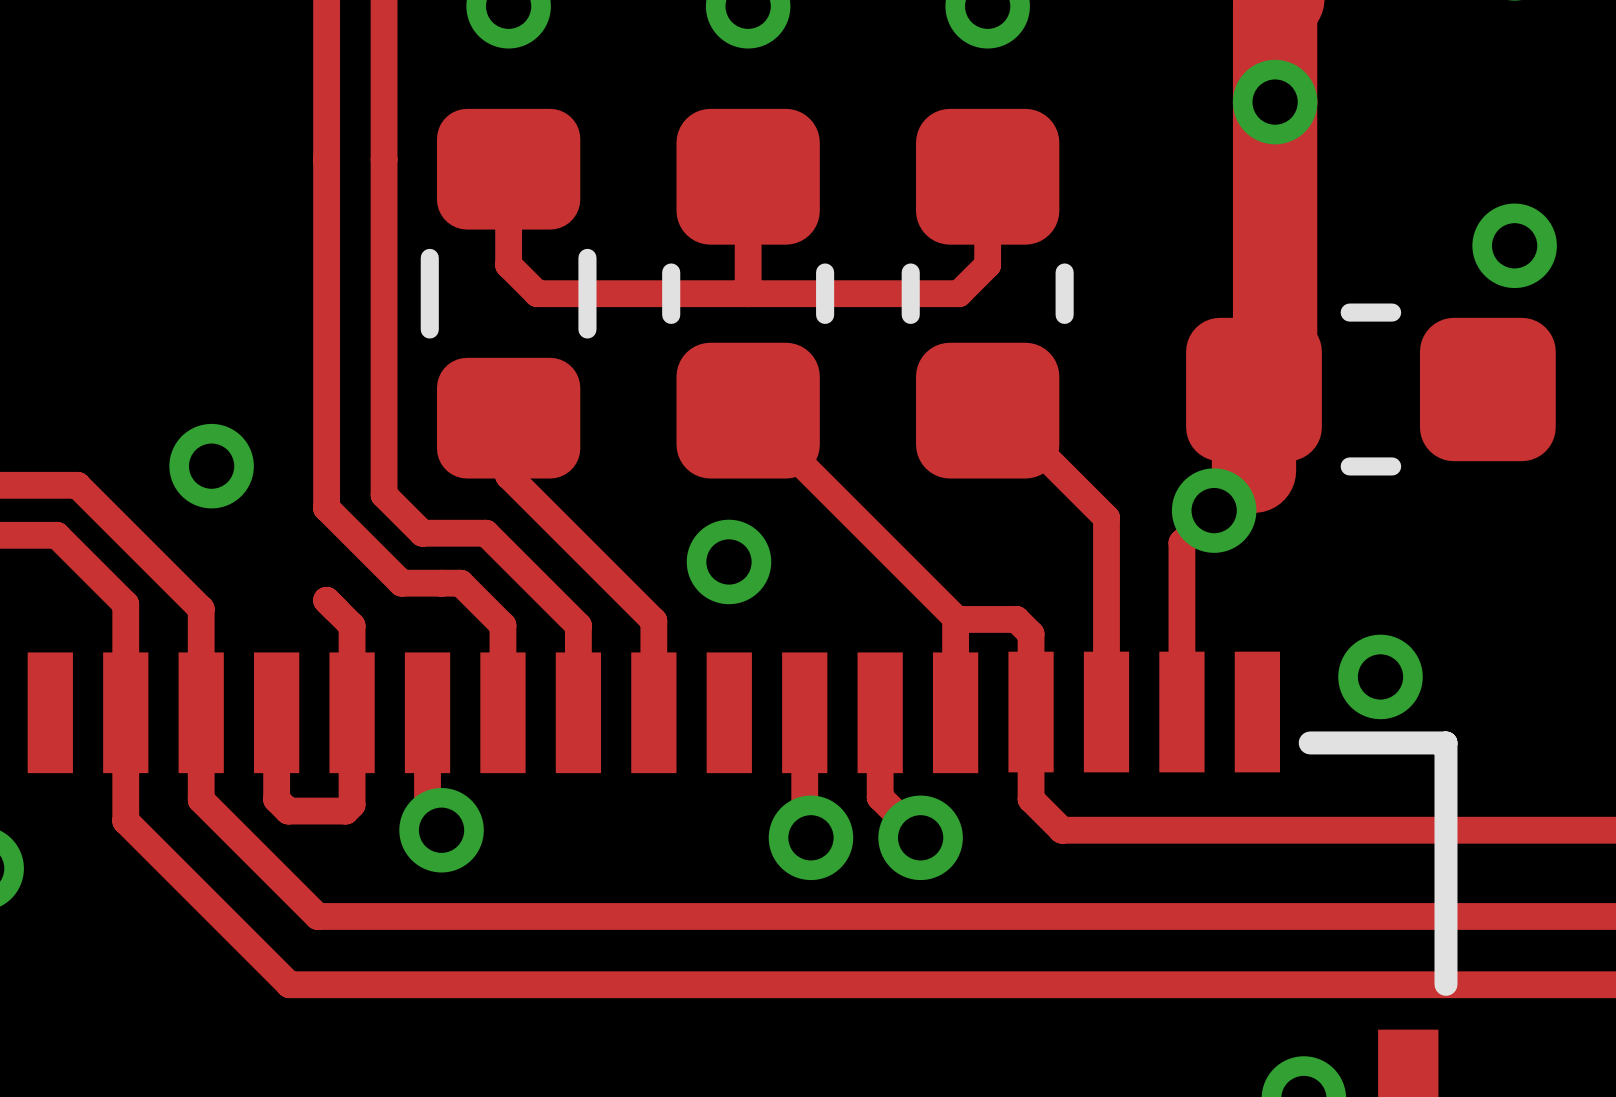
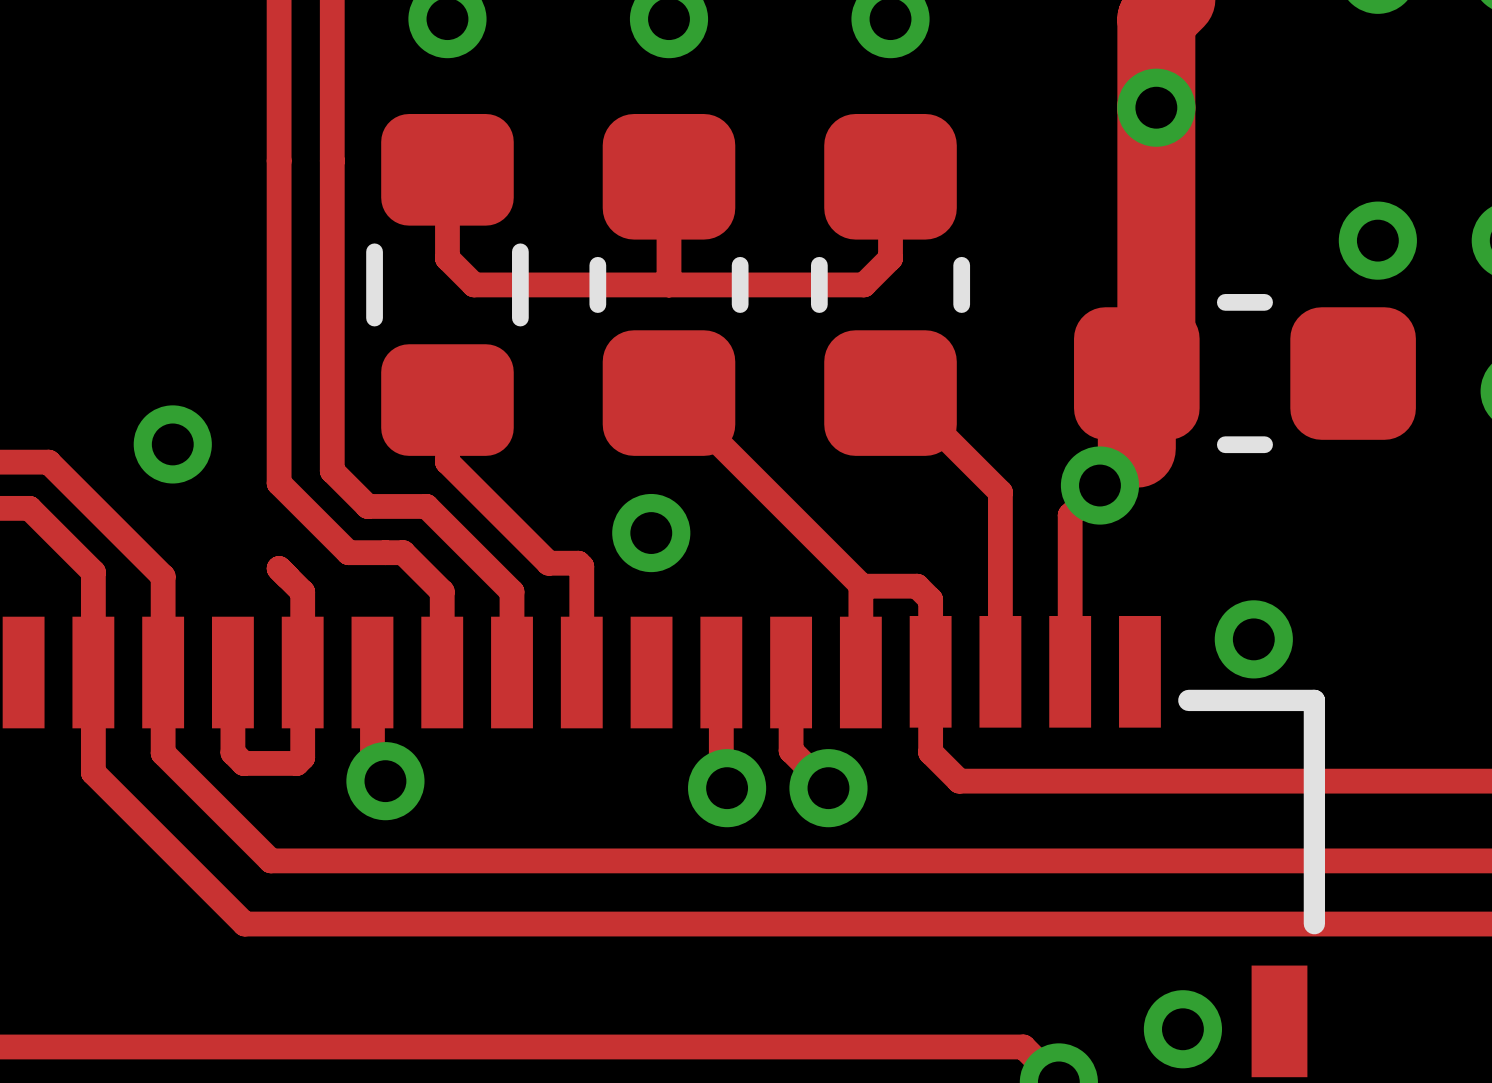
track: (508, 475) (653, 620) -> (447, 453) (447, 461) (548, 563) (578, 563) (581, 566) (581, 587)

